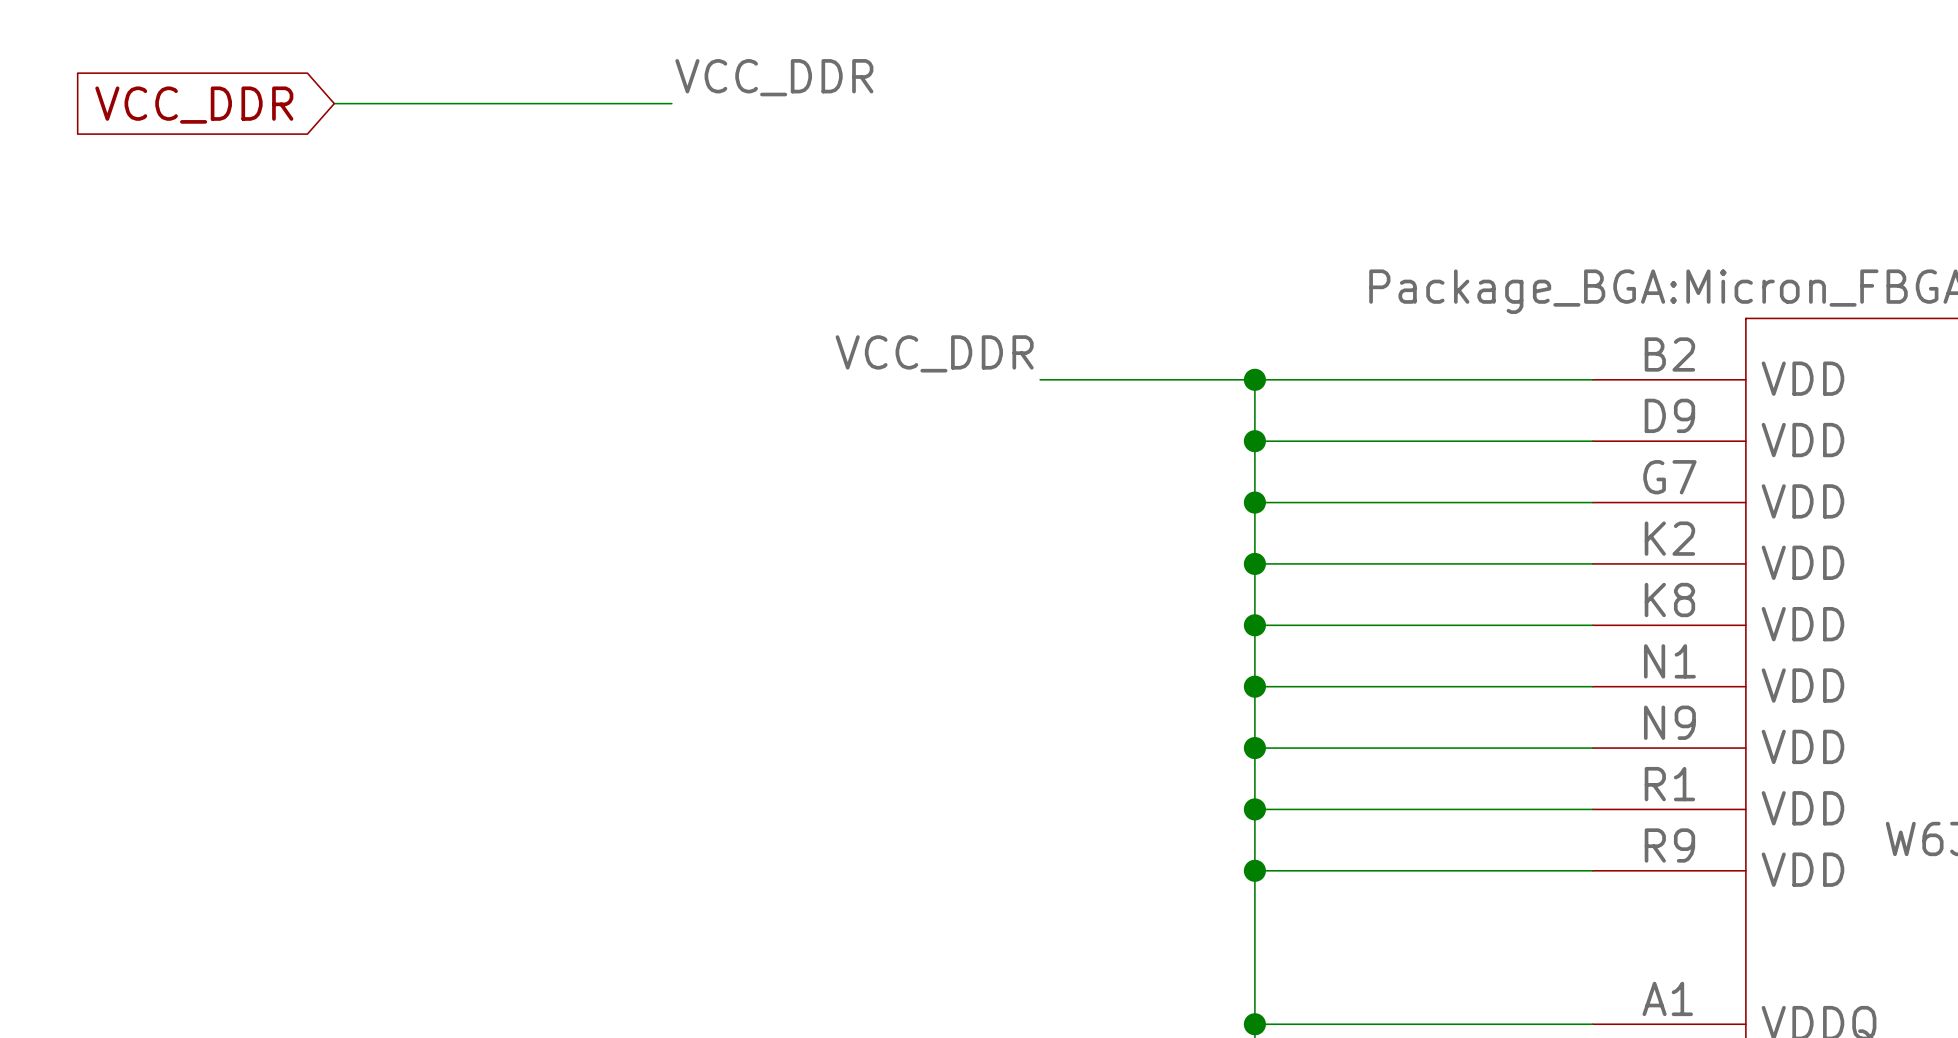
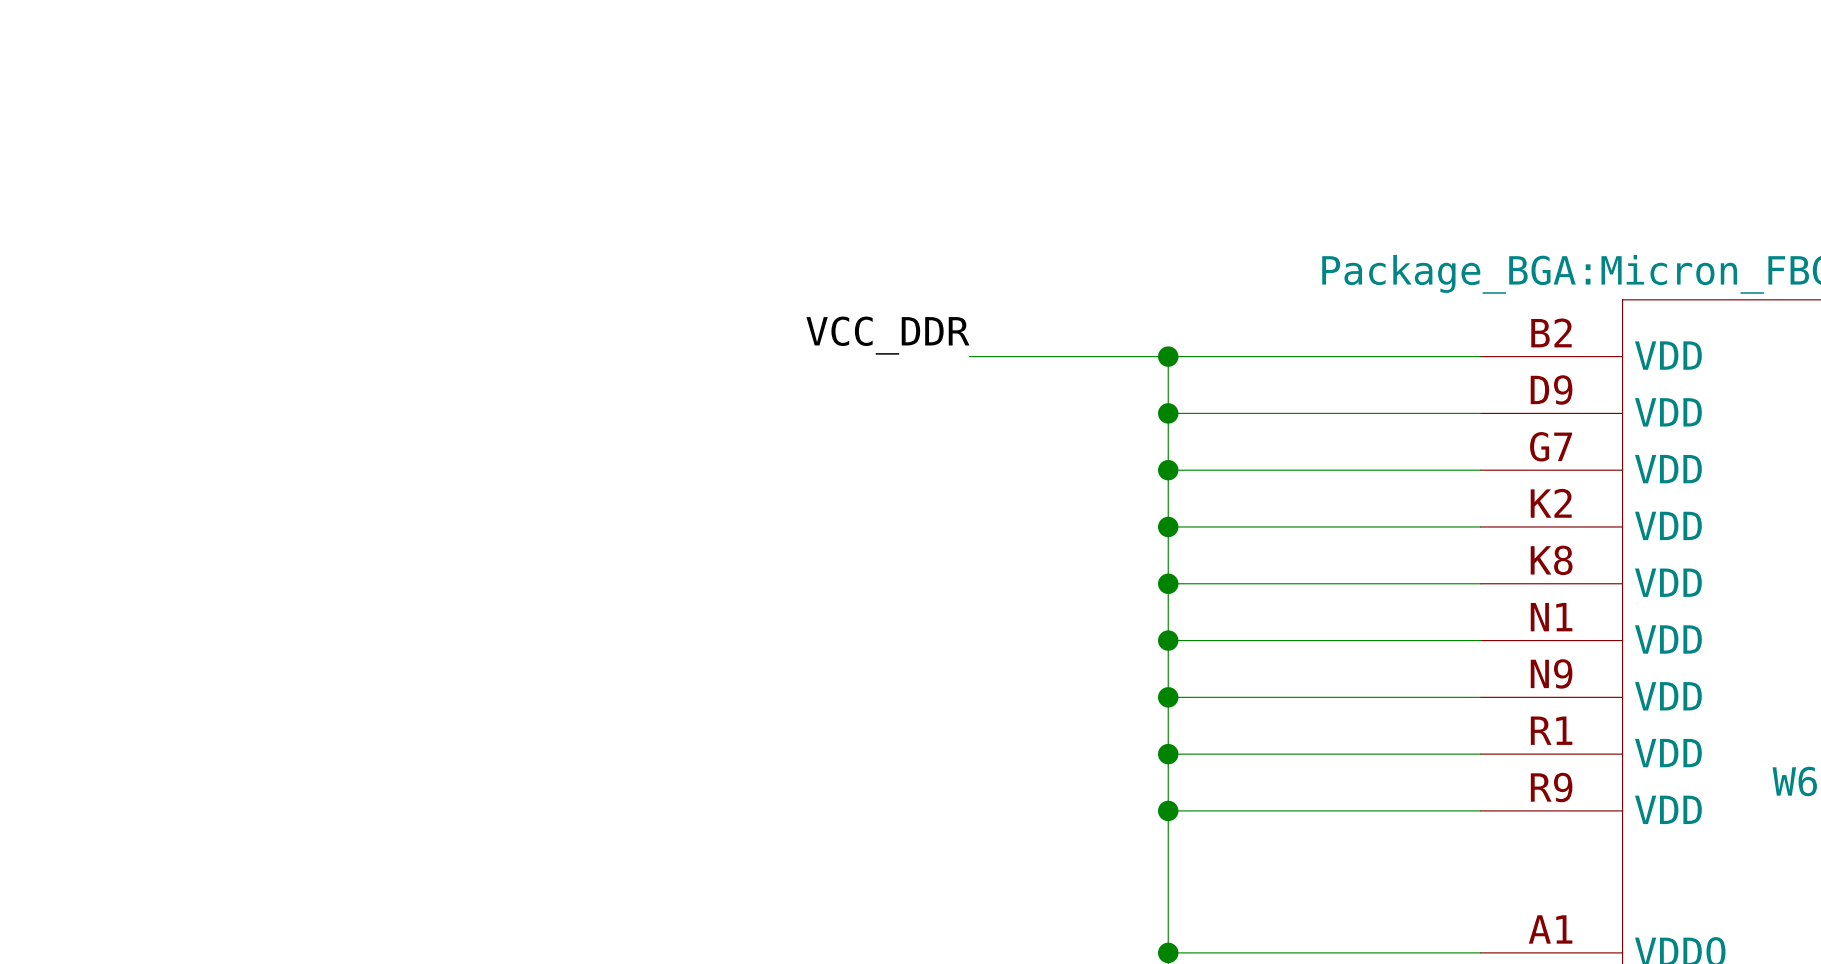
label: VCC_DDR (774, 77) -> none
wire: (334, 103) (671, 103) -> none
global label: VCC_DDR (194, 105) -> none

